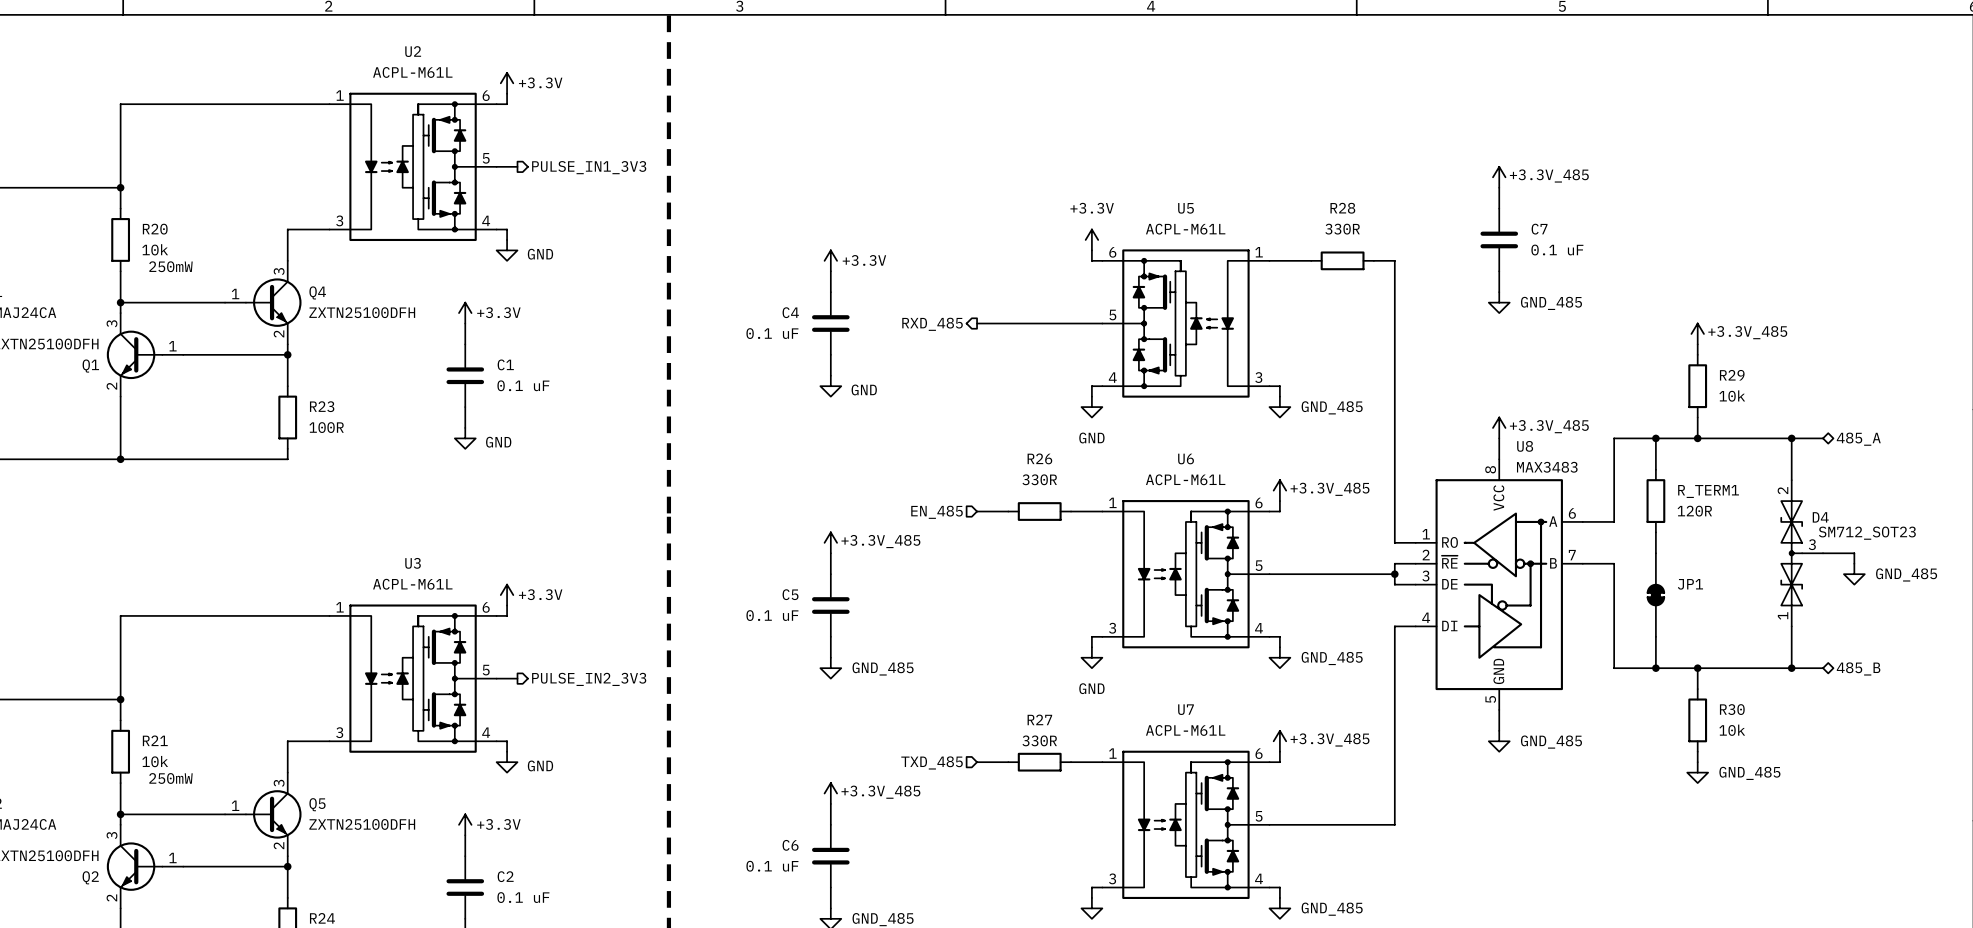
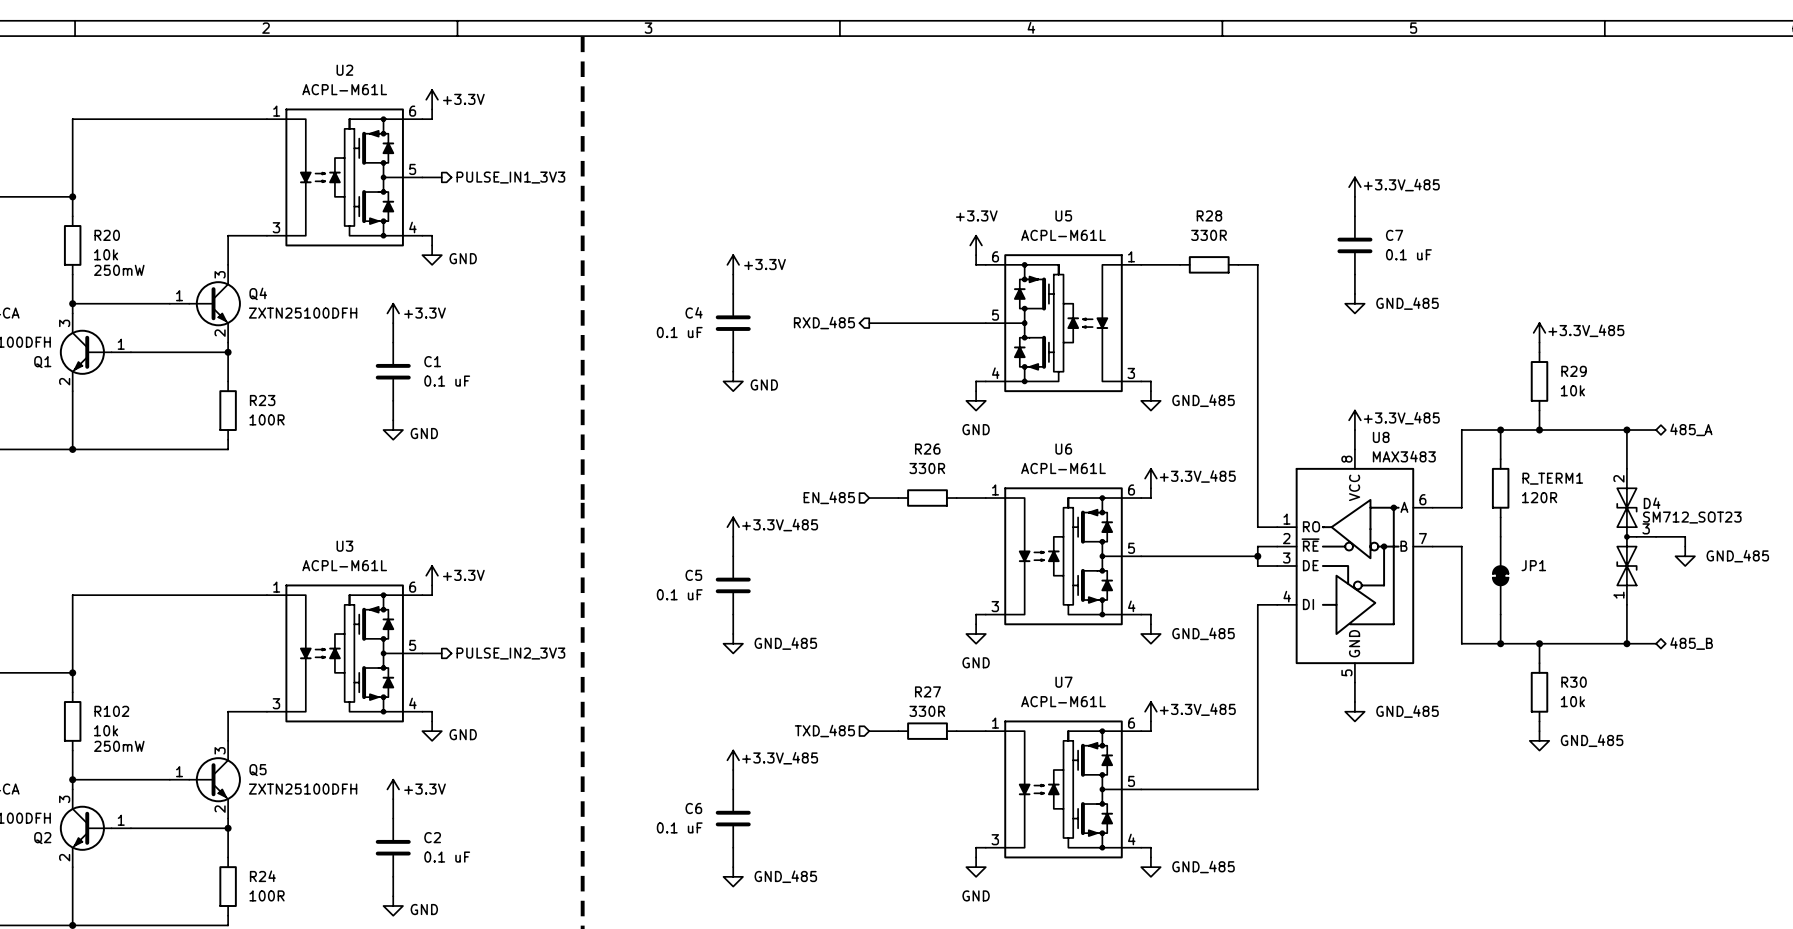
R21 name: R21 (155, 740) -> R102 (111, 711)

